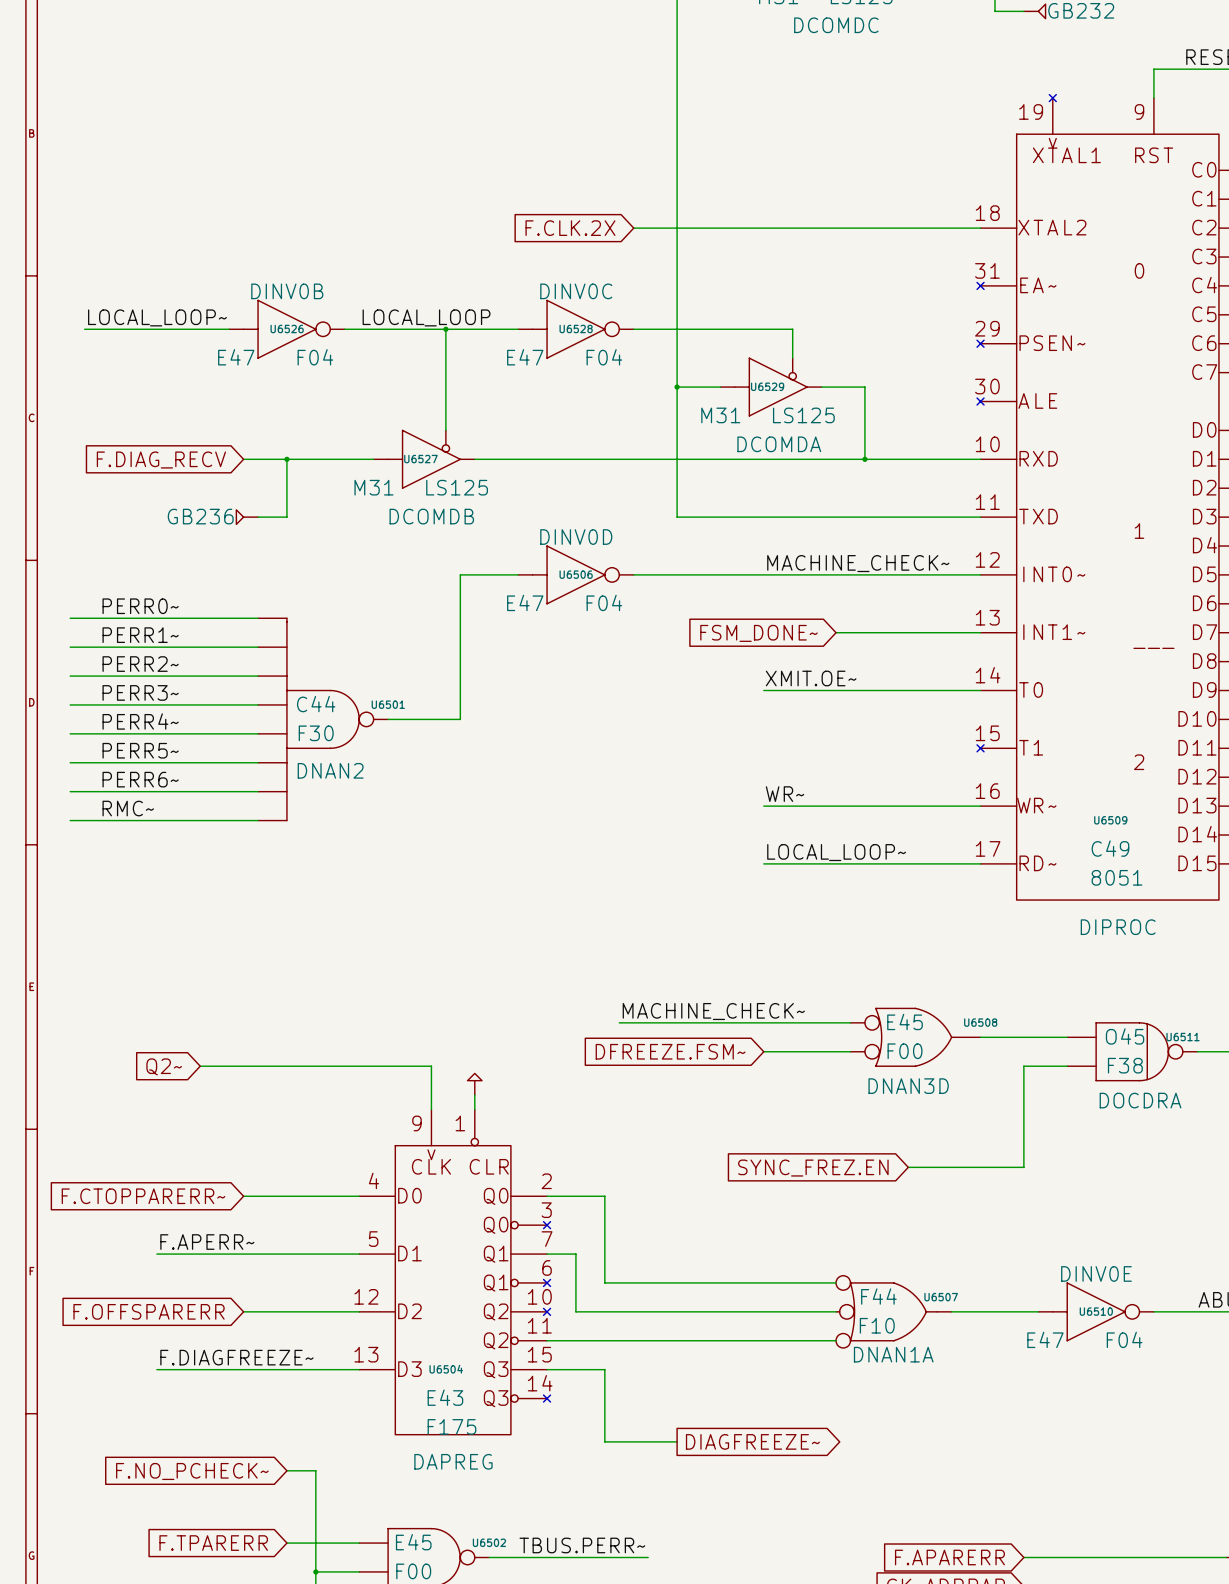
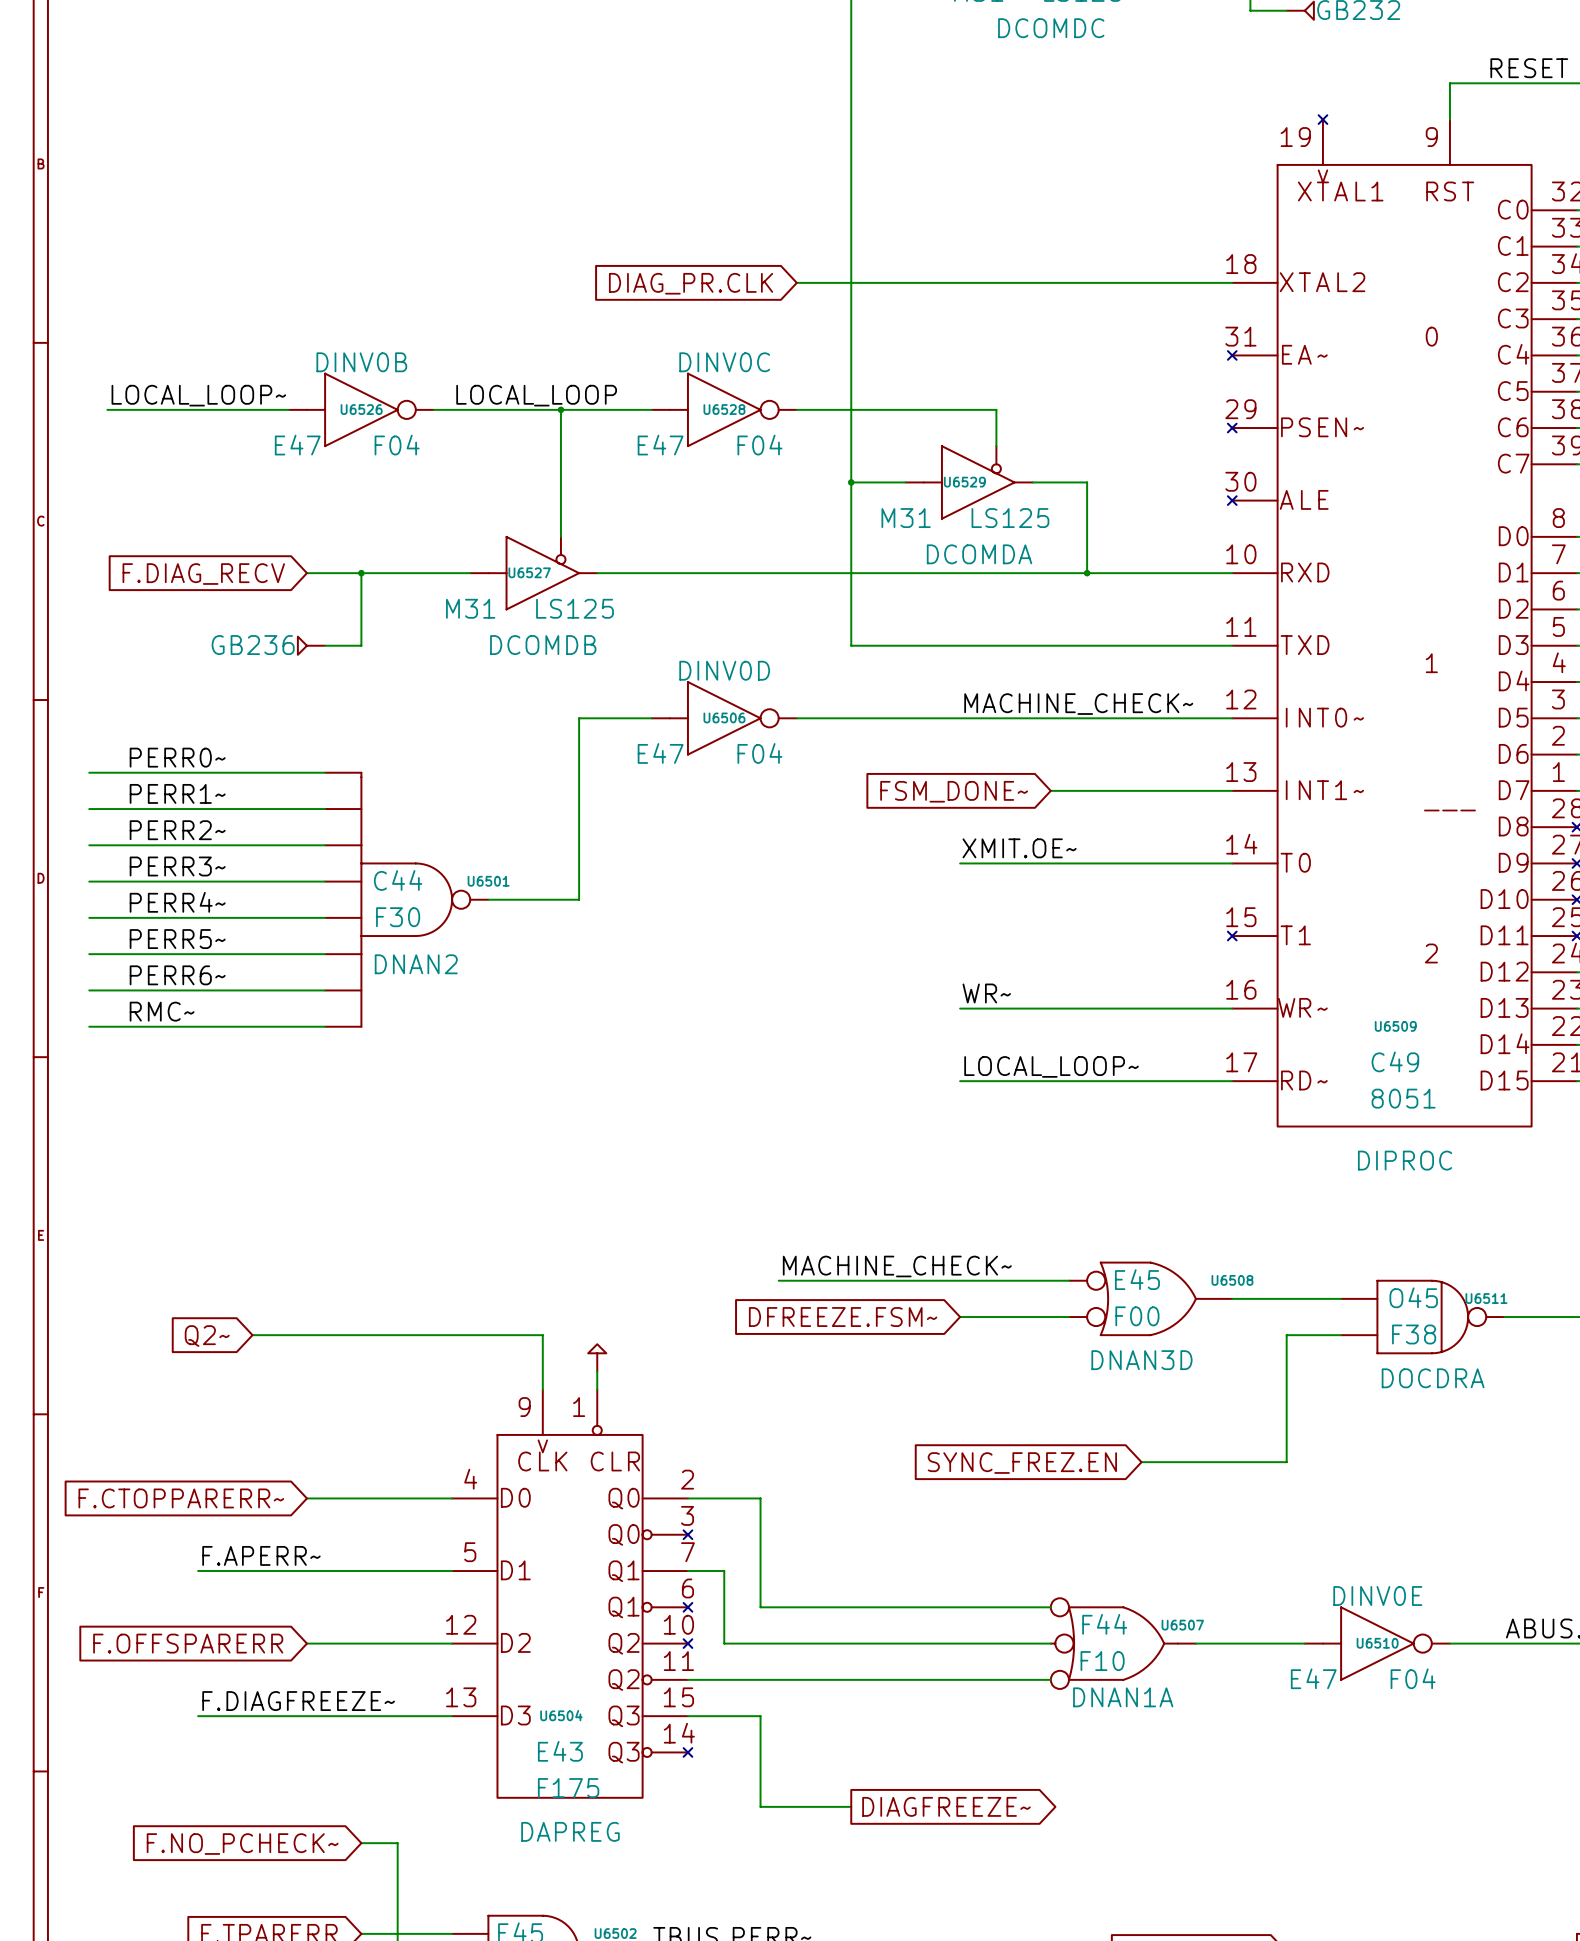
global label: F.CLK.2X (570, 228) -> DIAG_PR.CLK (691, 283)

